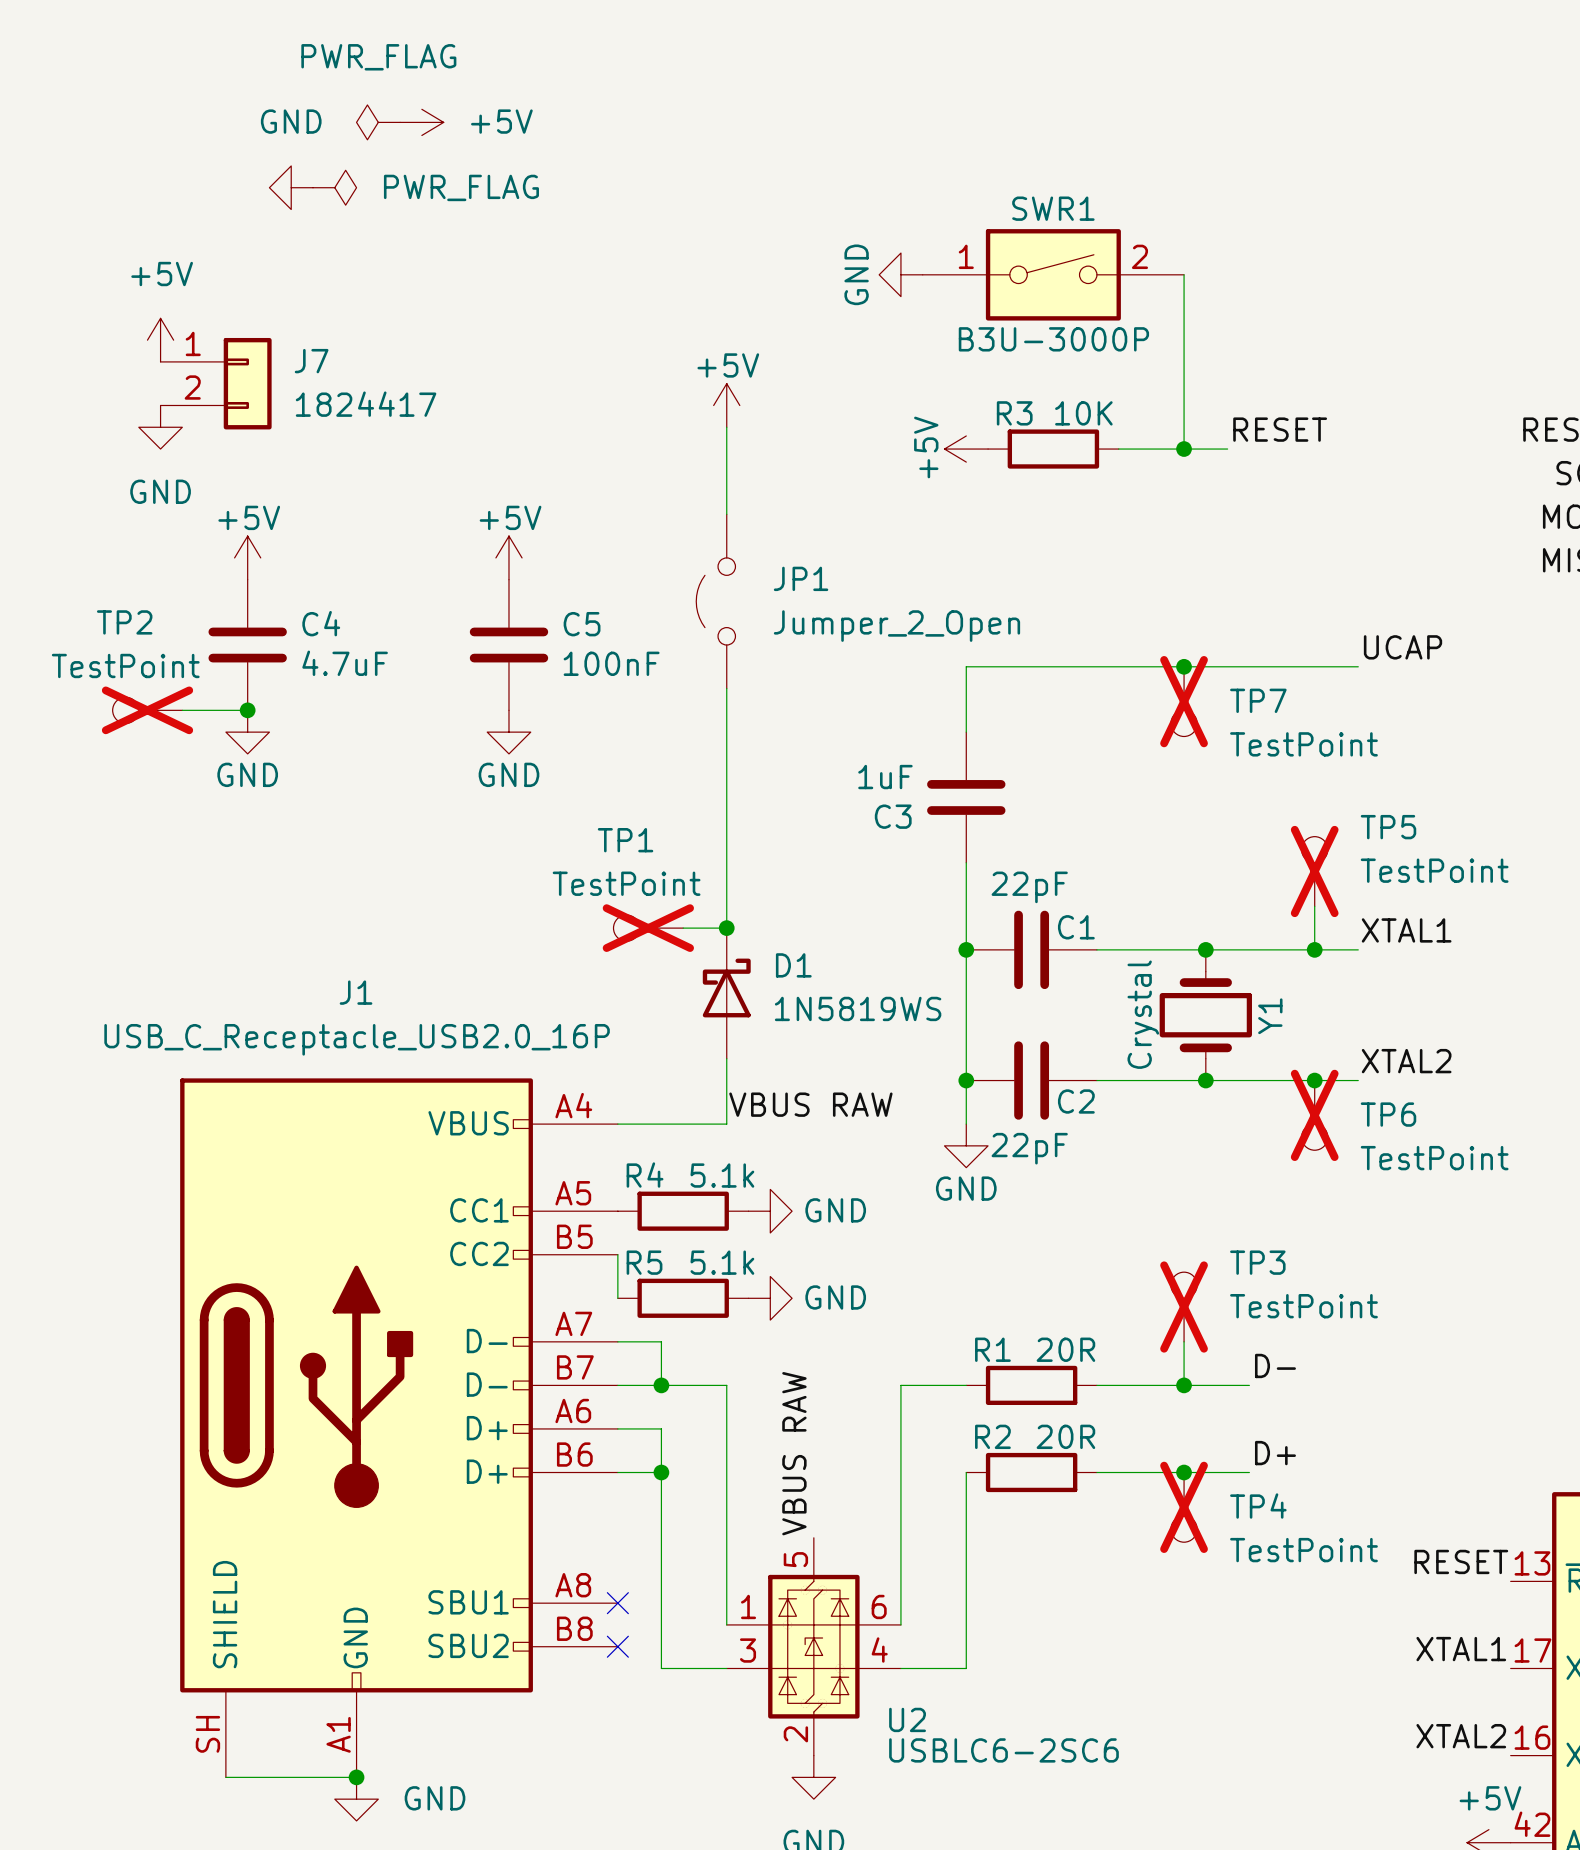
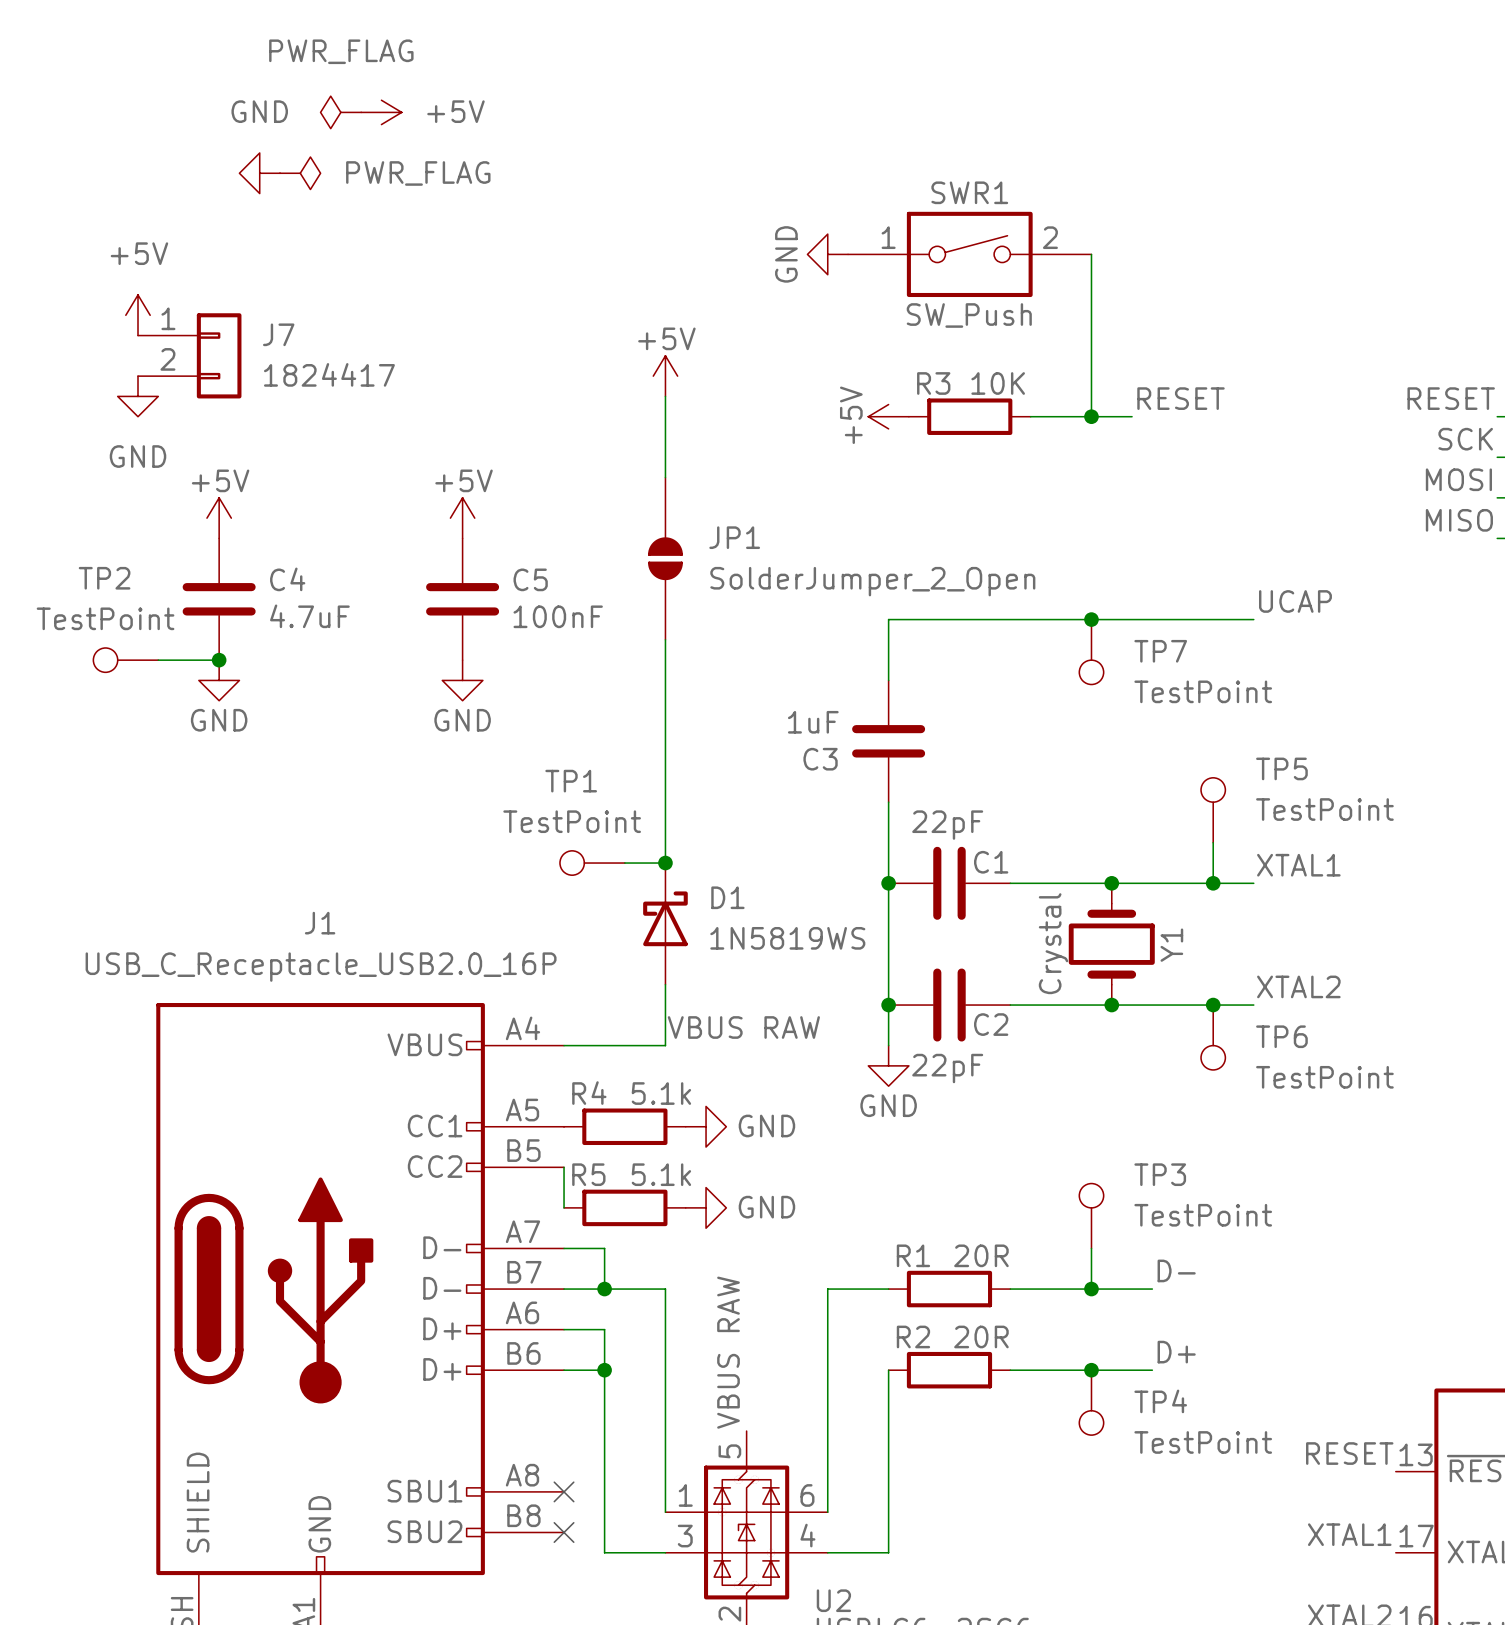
SWR1 value: B3U-3000P (1053, 339) -> SW_Push (969, 315)
JP1 symbol: [696, 514, 736, 689] -> [648, 477, 683, 640]
JP1 value: Jumper_2_Open (896, 626) -> SolderJumper_2_Open (872, 581)
TP7 do-not-place cross: (1184, 701) -> none
TP2 do-not-place cross: (147, 710) -> none
TP5 do-not-place cross: (1314, 871) -> none
TP1 do-not-place cross: (648, 928) -> none
TP6 do-not-place cross: (1314, 1115) -> none
TP3 do-not-place cross: (1184, 1307) -> none
TP4 do-not-place cross: (1184, 1507) -> none

